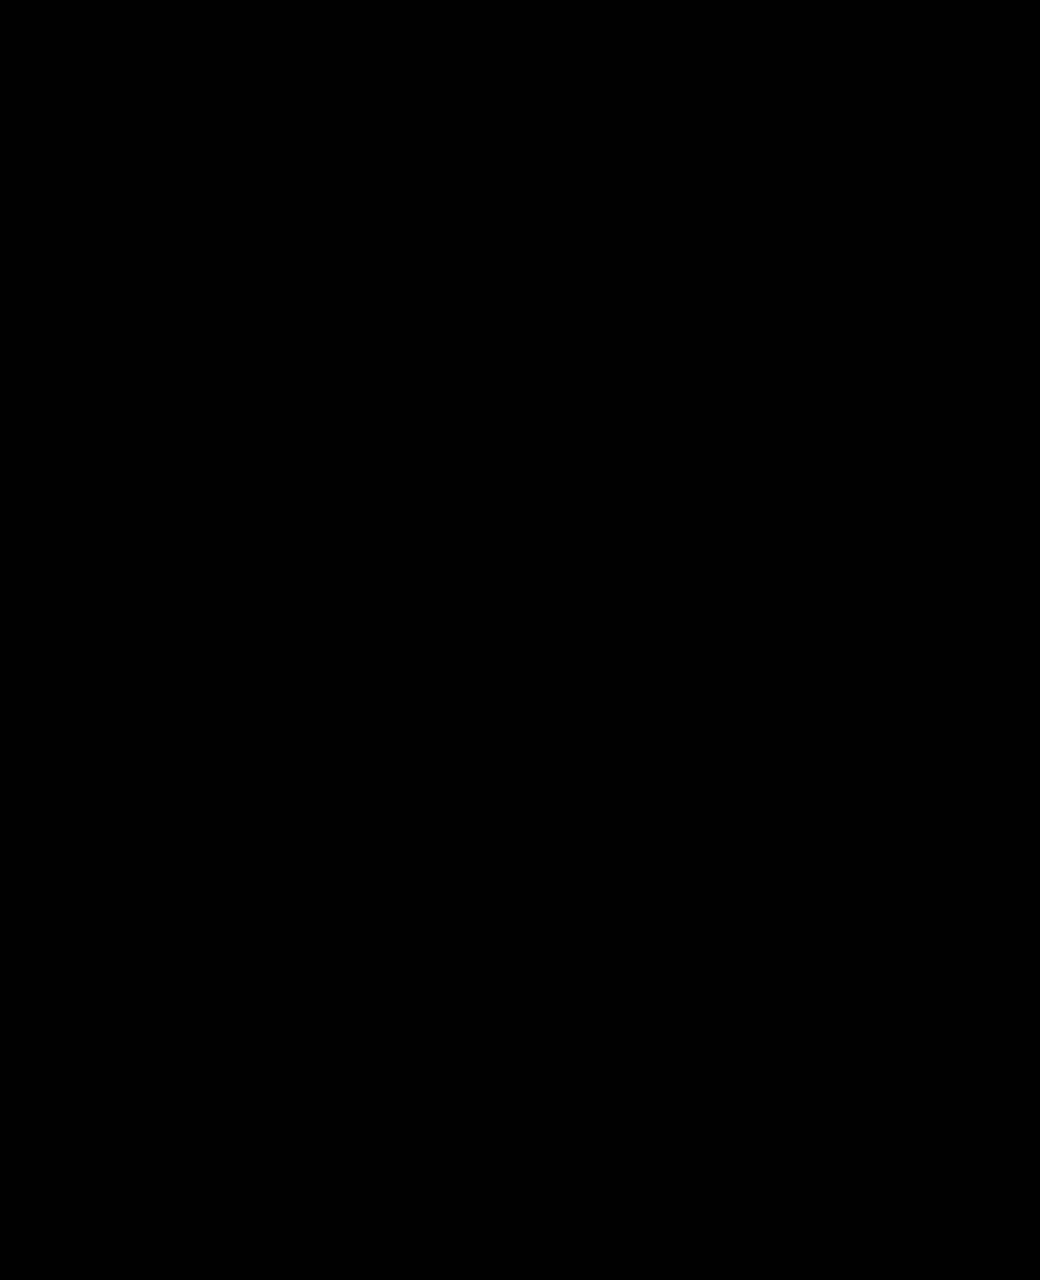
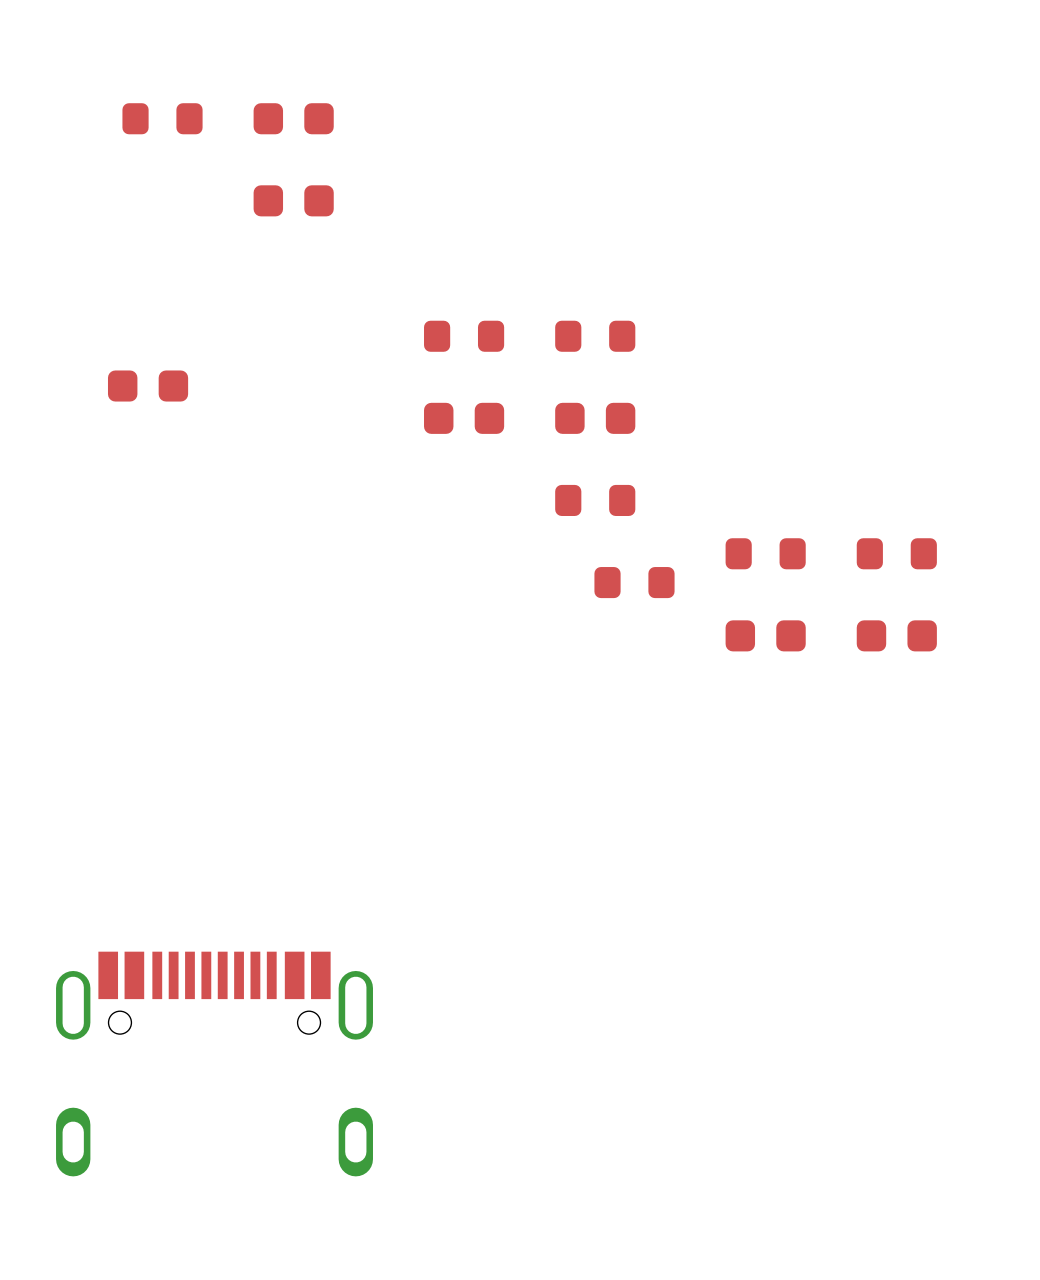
part: none -> (162, 118)
part: none -> (293, 118)
part: none -> (293, 200)
part: none -> (464, 336)
part: none -> (595, 336)
part: none -> (148, 386)
part: none -> (464, 418)
part: none -> (595, 418)
part: none -> (595, 500)
part: none -> (765, 553)
part: none -> (896, 553)
part: none -> (634, 582)
part: none -> (765, 635)
part: none -> (896, 635)
part: none -> (214, 1064)

